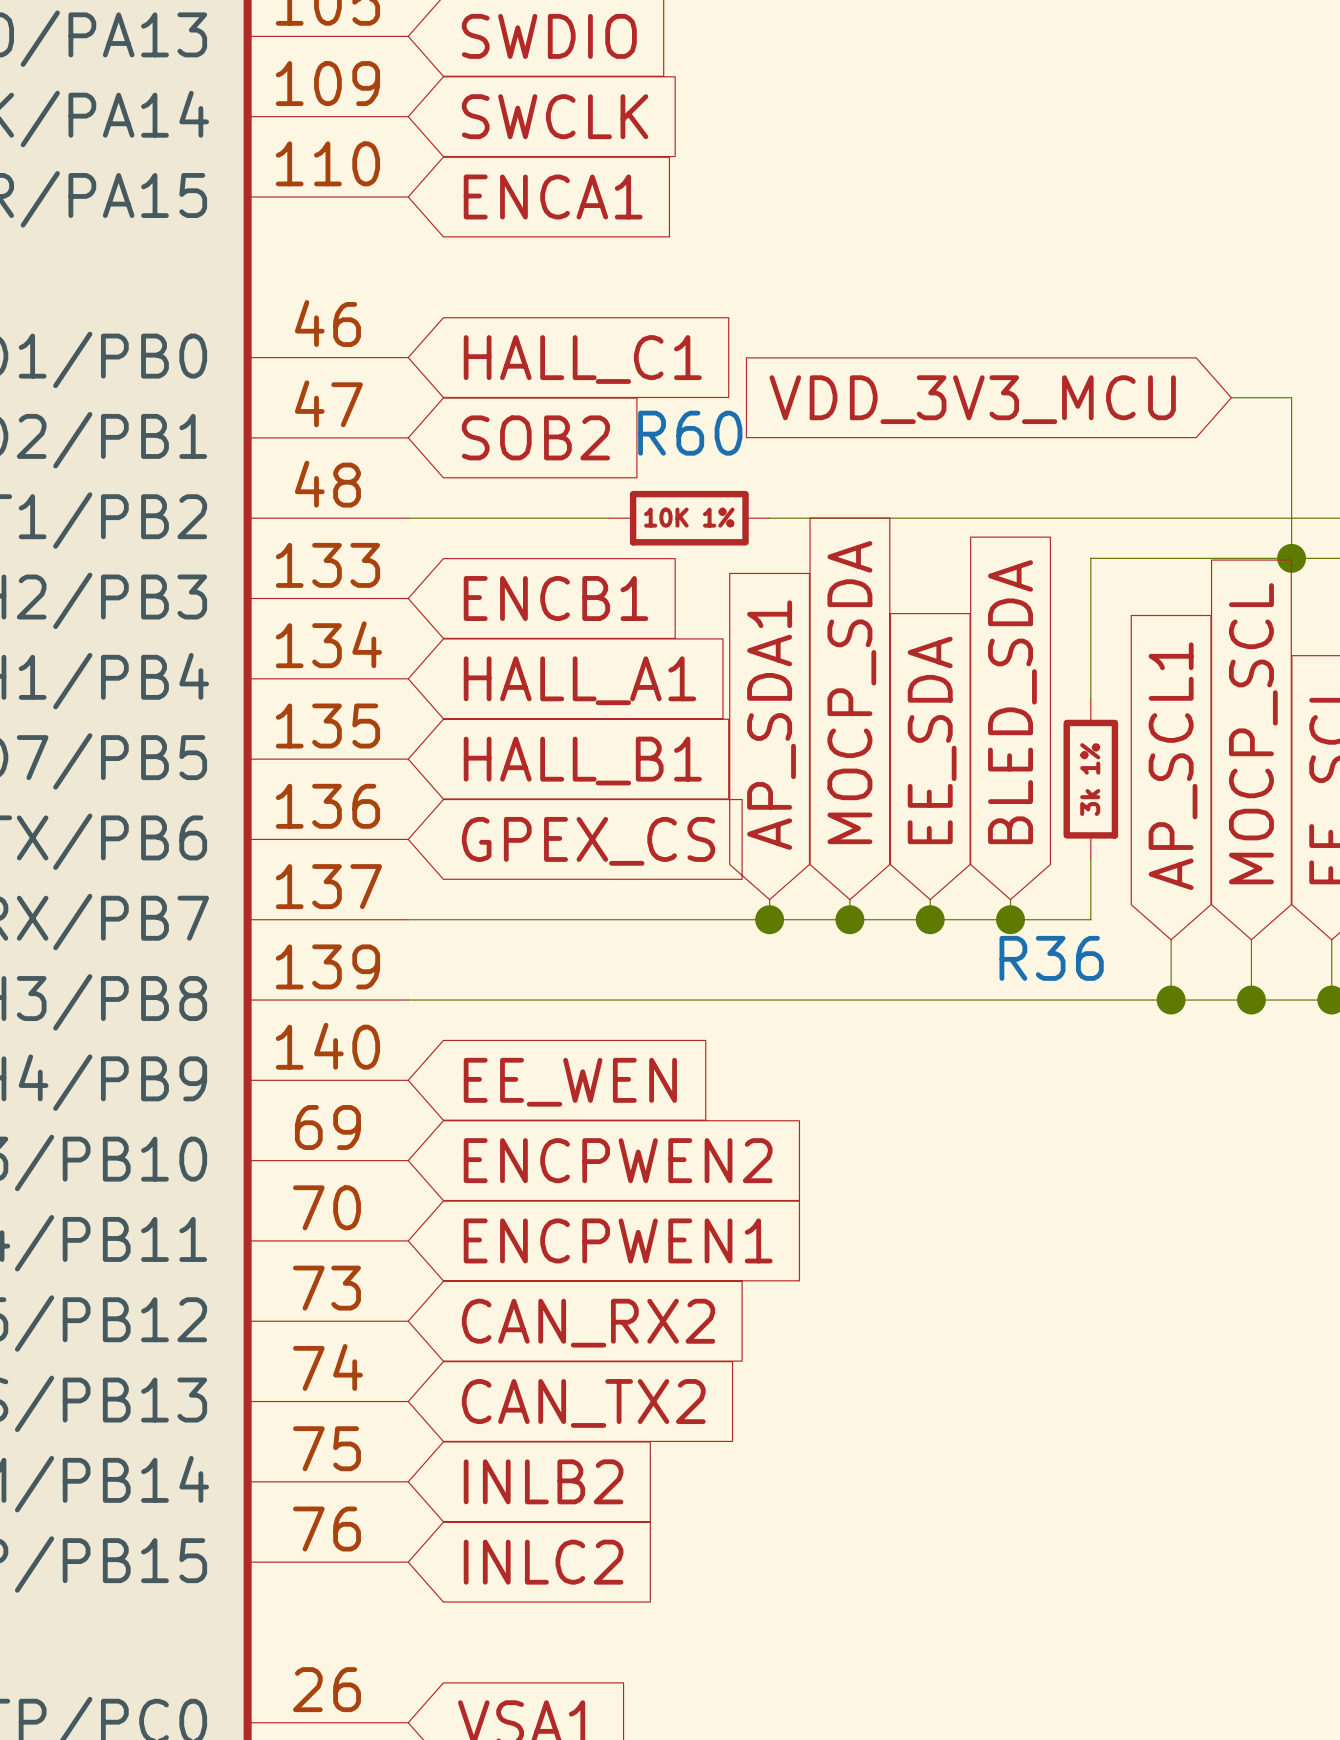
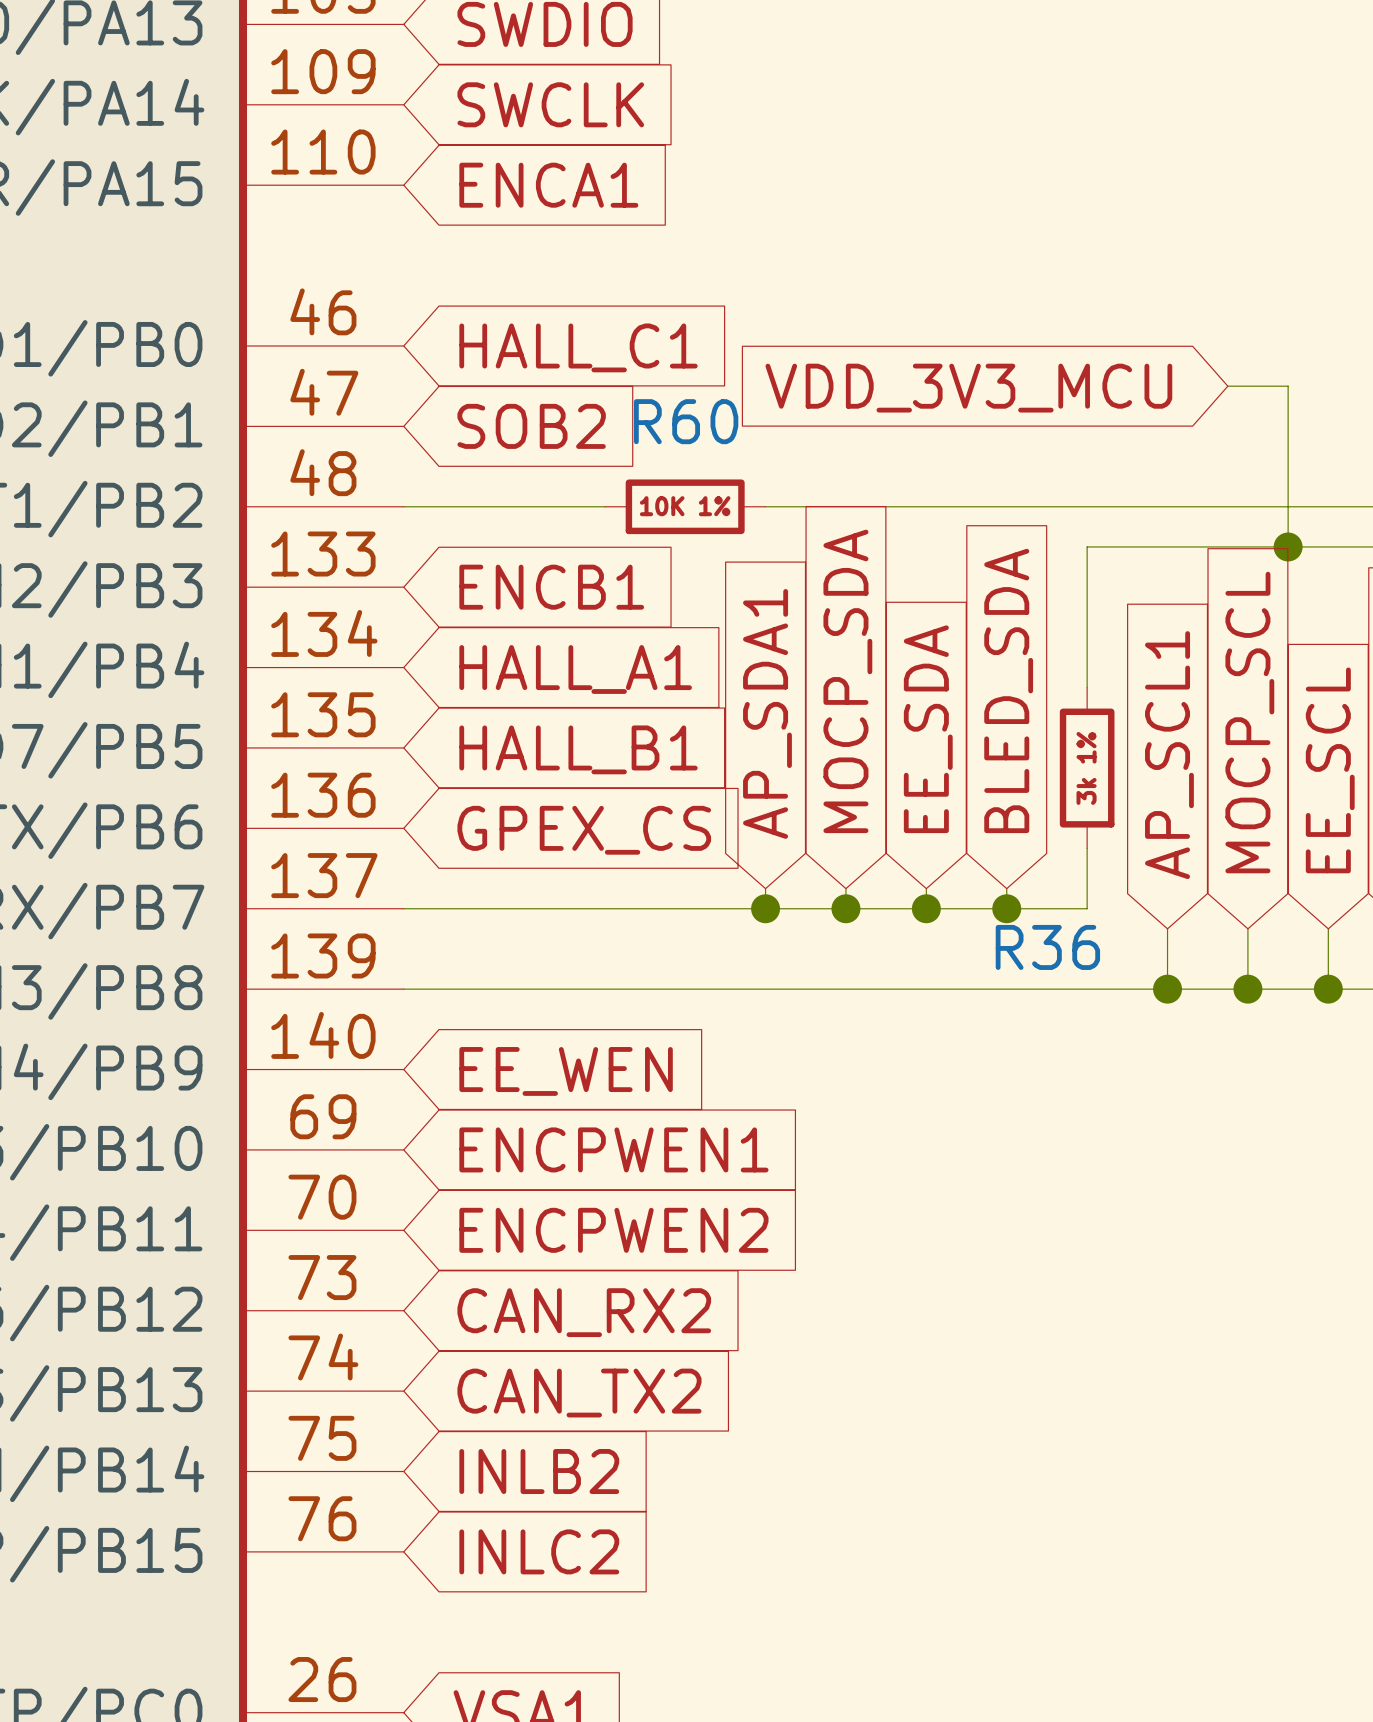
global label: ENCPWEN2 (618, 1160) -> ENCPWEN1 (613, 1149)
global label: ENCPWEN1 (618, 1240) -> ENCPWEN2 (613, 1230)

